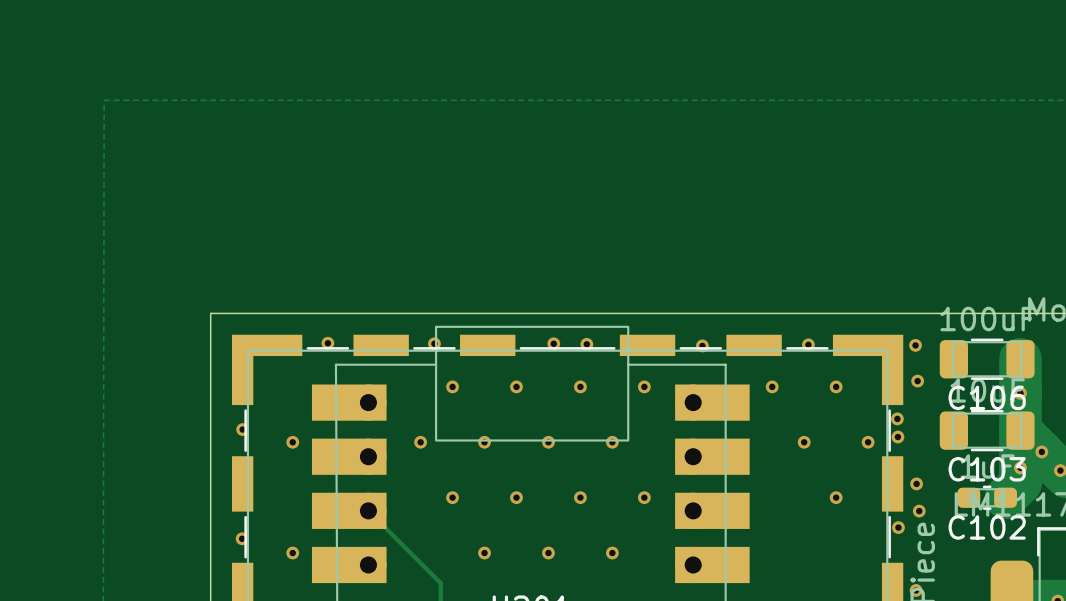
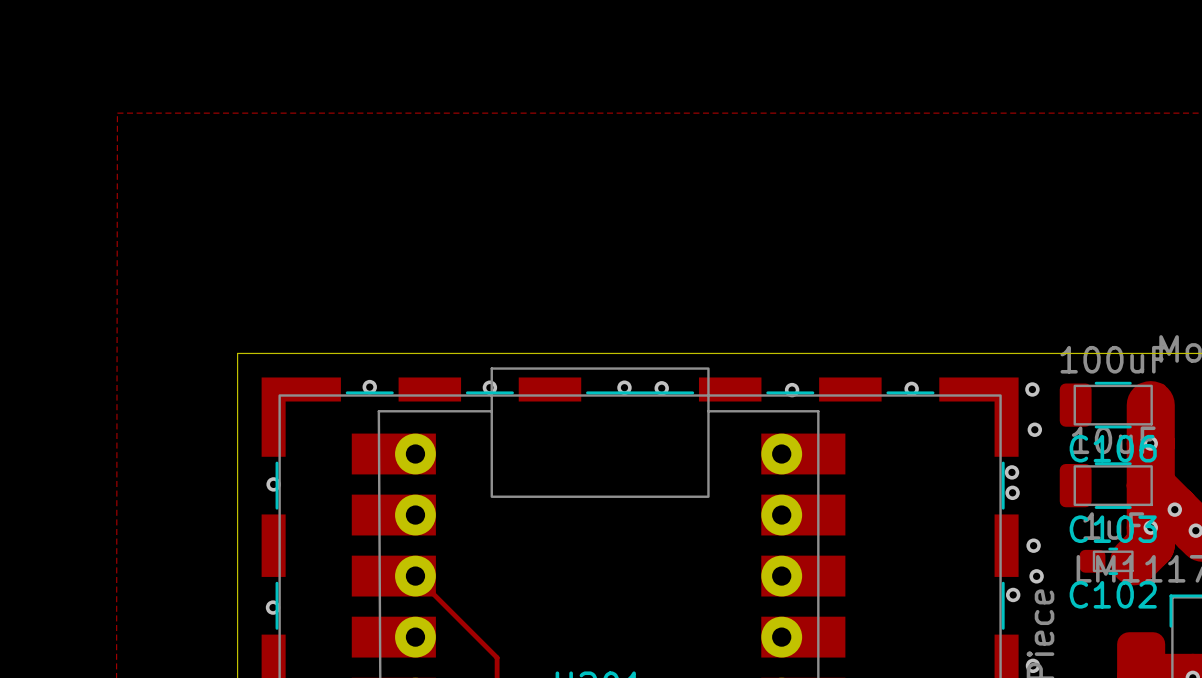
via: (452, 386) -> none
via: (516, 386) -> none
via: (580, 386) -> none
via: (644, 386) -> none
via: (772, 386) -> none
via: (836, 386) -> none
via: (292, 442) -> none
via: (420, 442) -> none
via: (484, 442) -> none
via: (548, 442) -> none
via: (612, 442) -> none
via: (804, 442) -> none
via: (868, 442) -> none
via: (452, 497) -> none
via: (516, 497) -> none
via: (580, 497) -> none
via: (644, 497) -> none
via: (836, 497) -> none
via: (292, 553) -> none
via: (484, 553) -> none
via: (548, 553) -> none
via: (612, 553) -> none

